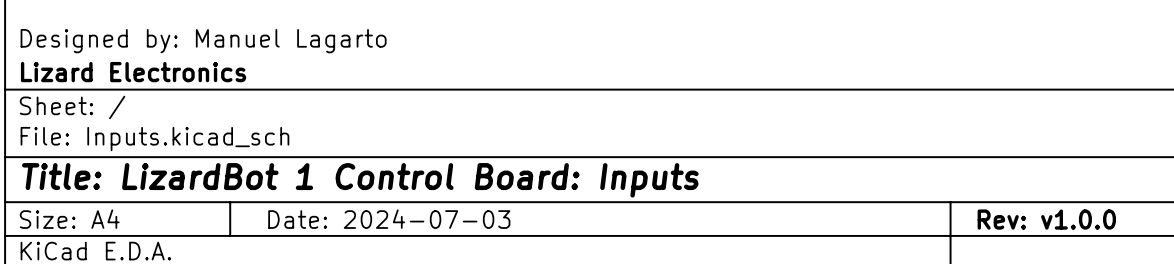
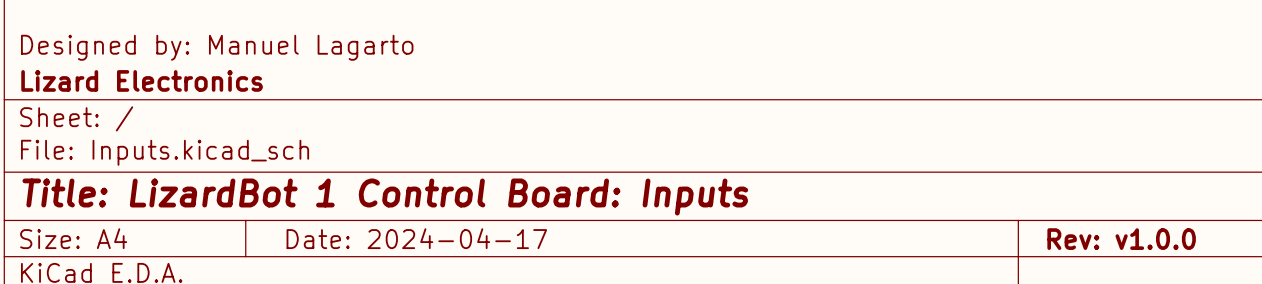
title block: Date: 2024-07-03 (389, 219) -> Date: 2024-04-17 (416, 238)

